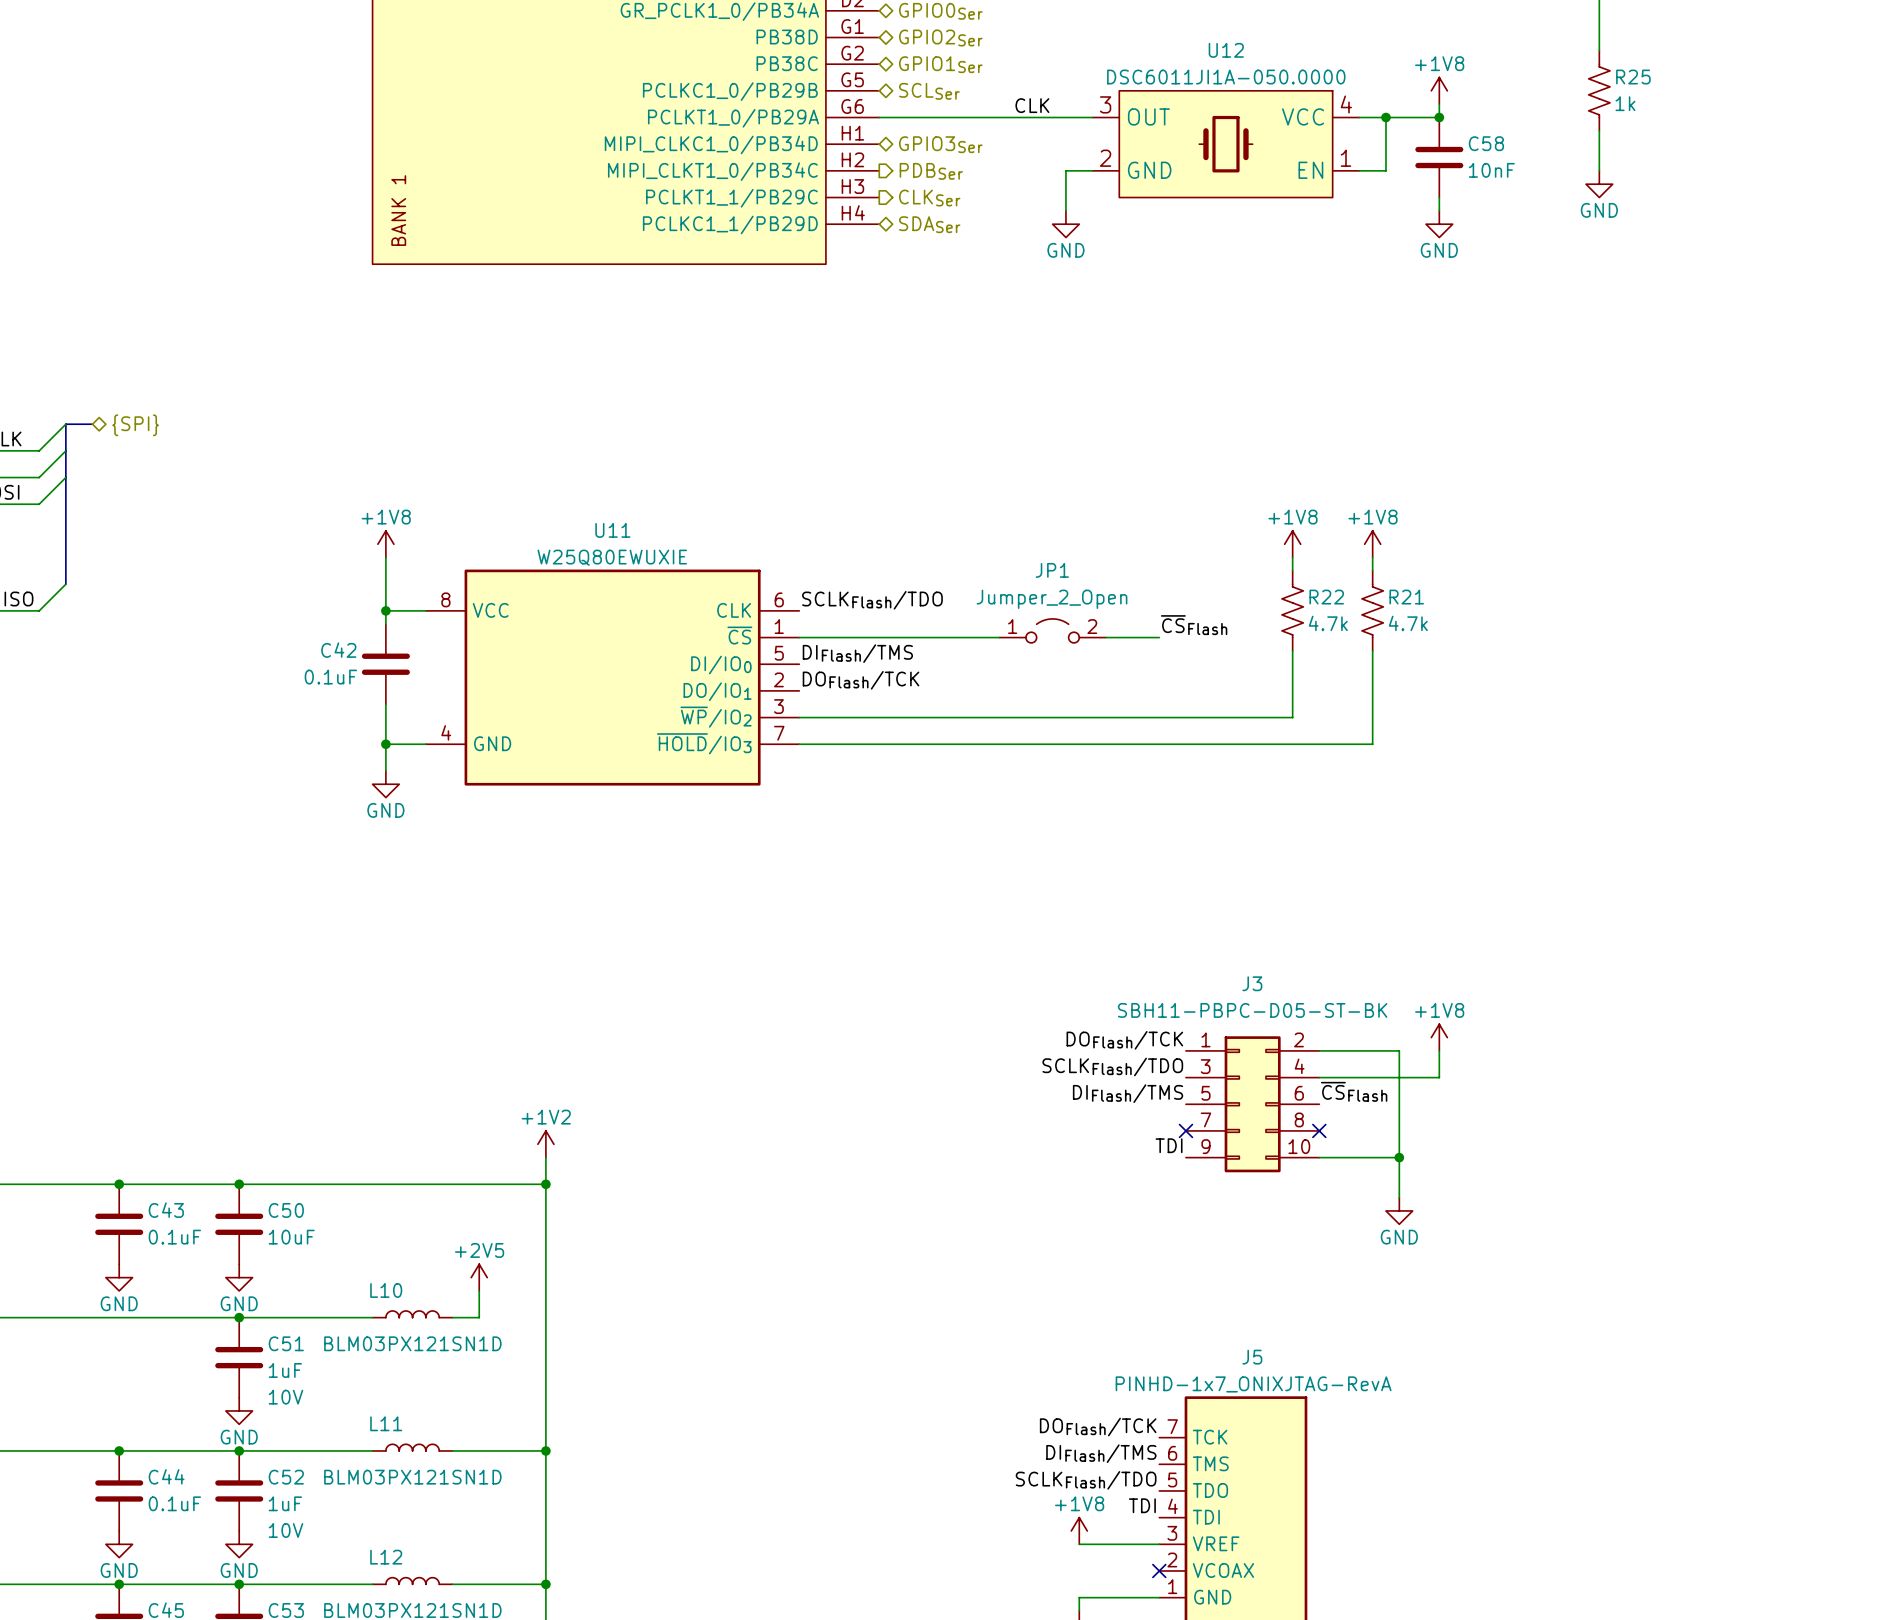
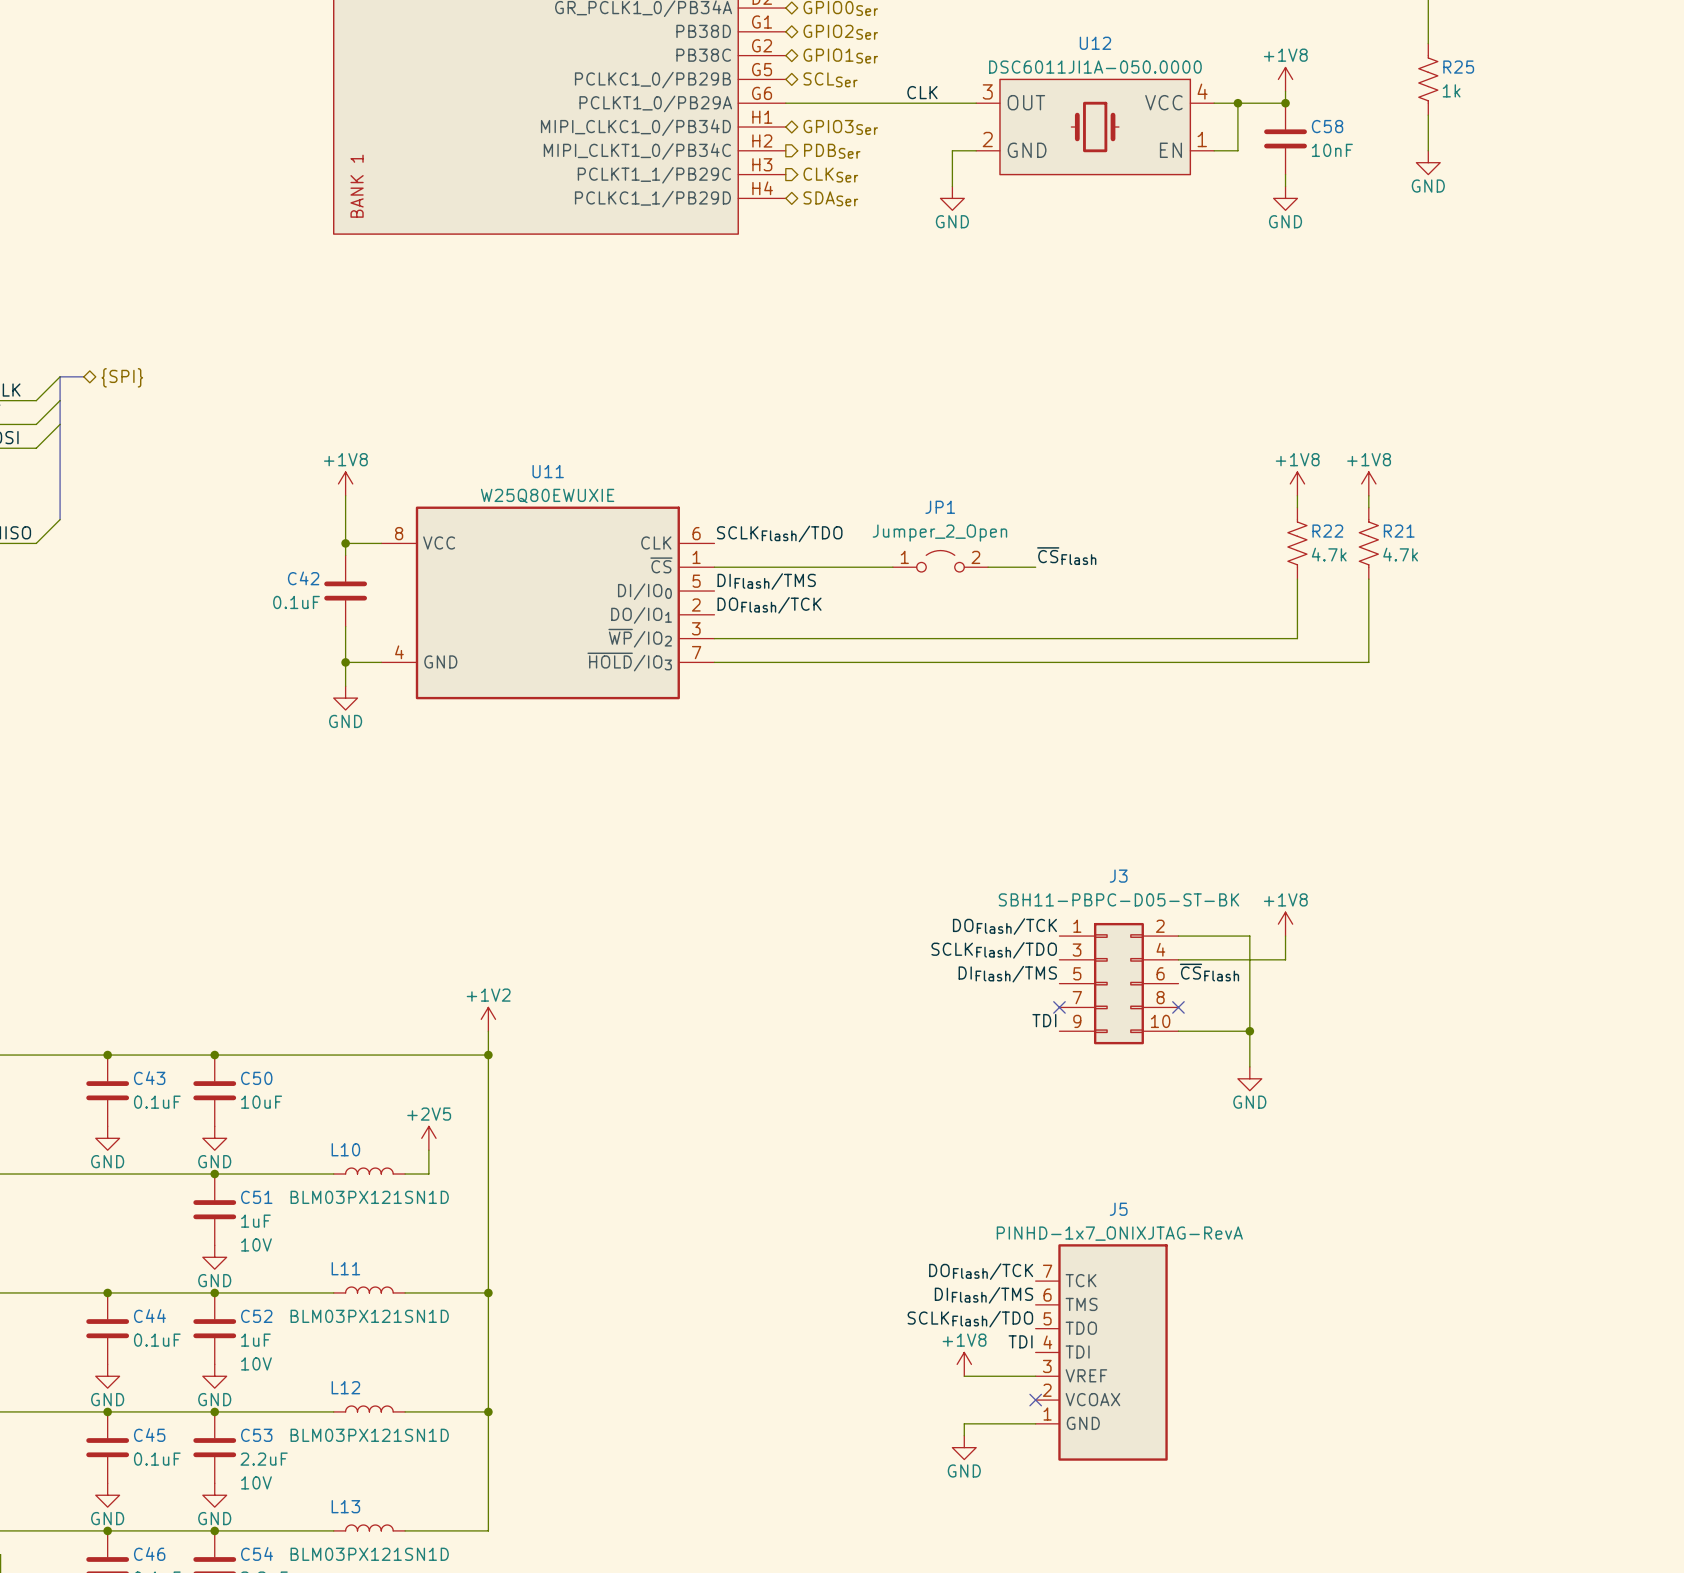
power symbol: +1V8 (1292, 544) -> none
power symbol: +1V8 (1372, 544) -> none
power symbol: none -> +1V8 (1297, 483)
power symbol: none -> +1V8 (1368, 483)
wire: (1292, 557) (1292, 570) -> (1368, 495) (1368, 507)
wire: (1372, 557) (1372, 570) -> (1297, 495) (1297, 507)
R22 position: (1292, 610) -> (1297, 543)
R21 position: (1372, 610) -> (1368, 543)
wire: (1292, 650) (1292, 717) -> (1297, 579) (1297, 638) (1154, 638)
wire: (1372, 650) (1372, 744) -> (1368, 579) (1368, 662) (1226, 662)

